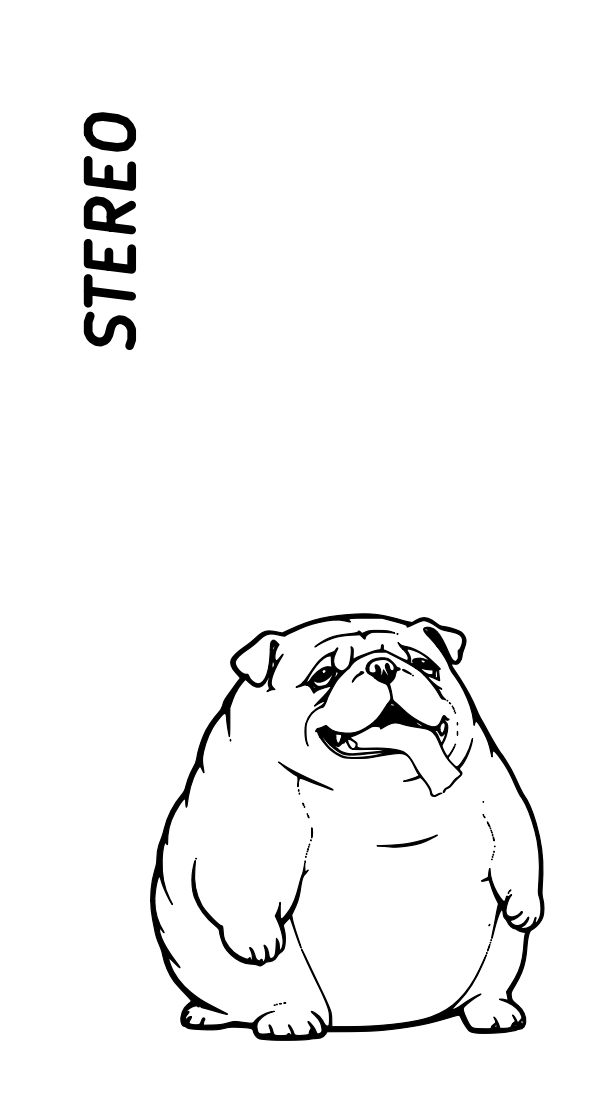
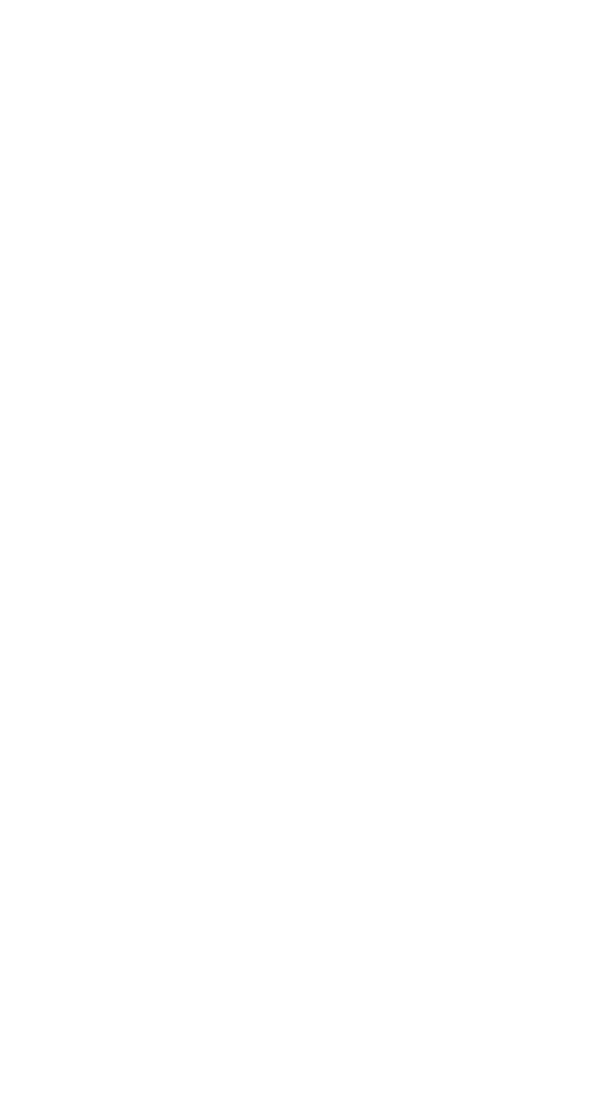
text: STEREO (109, 231) -> none
drawing: [150, 613, 545, 1041] -> none

